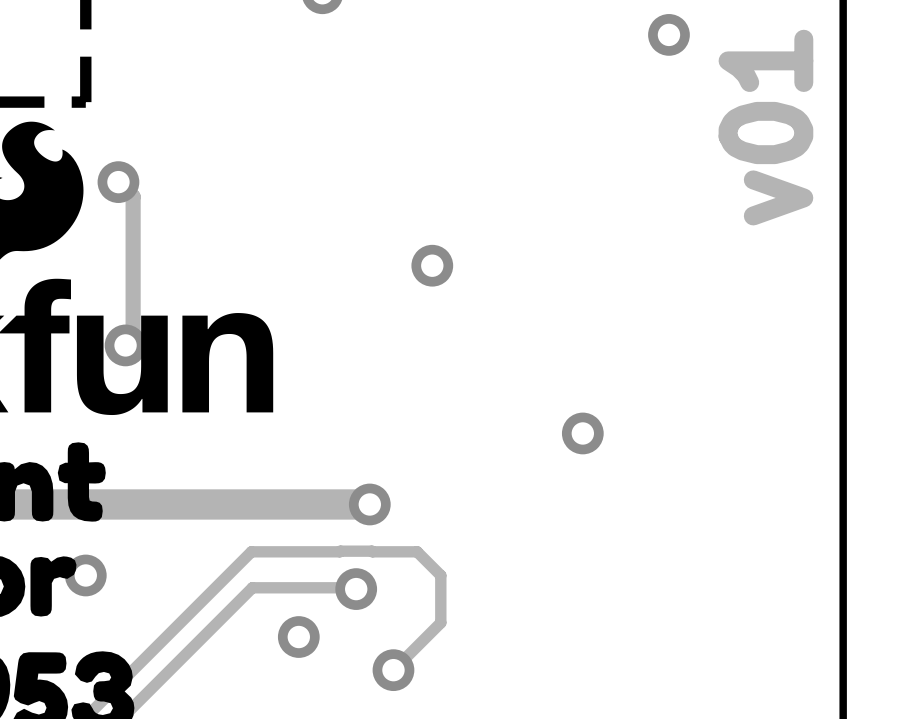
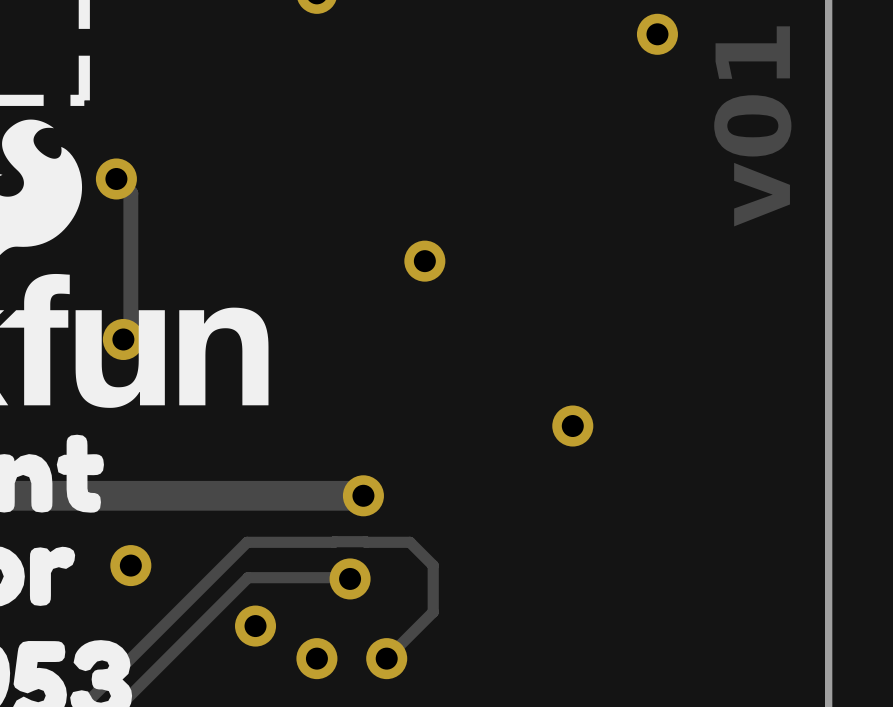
via position: (85, 575) -> (130, 565)
via: none -> (255, 626)
via: (298, 637) -> none
via: none -> (316, 658)

